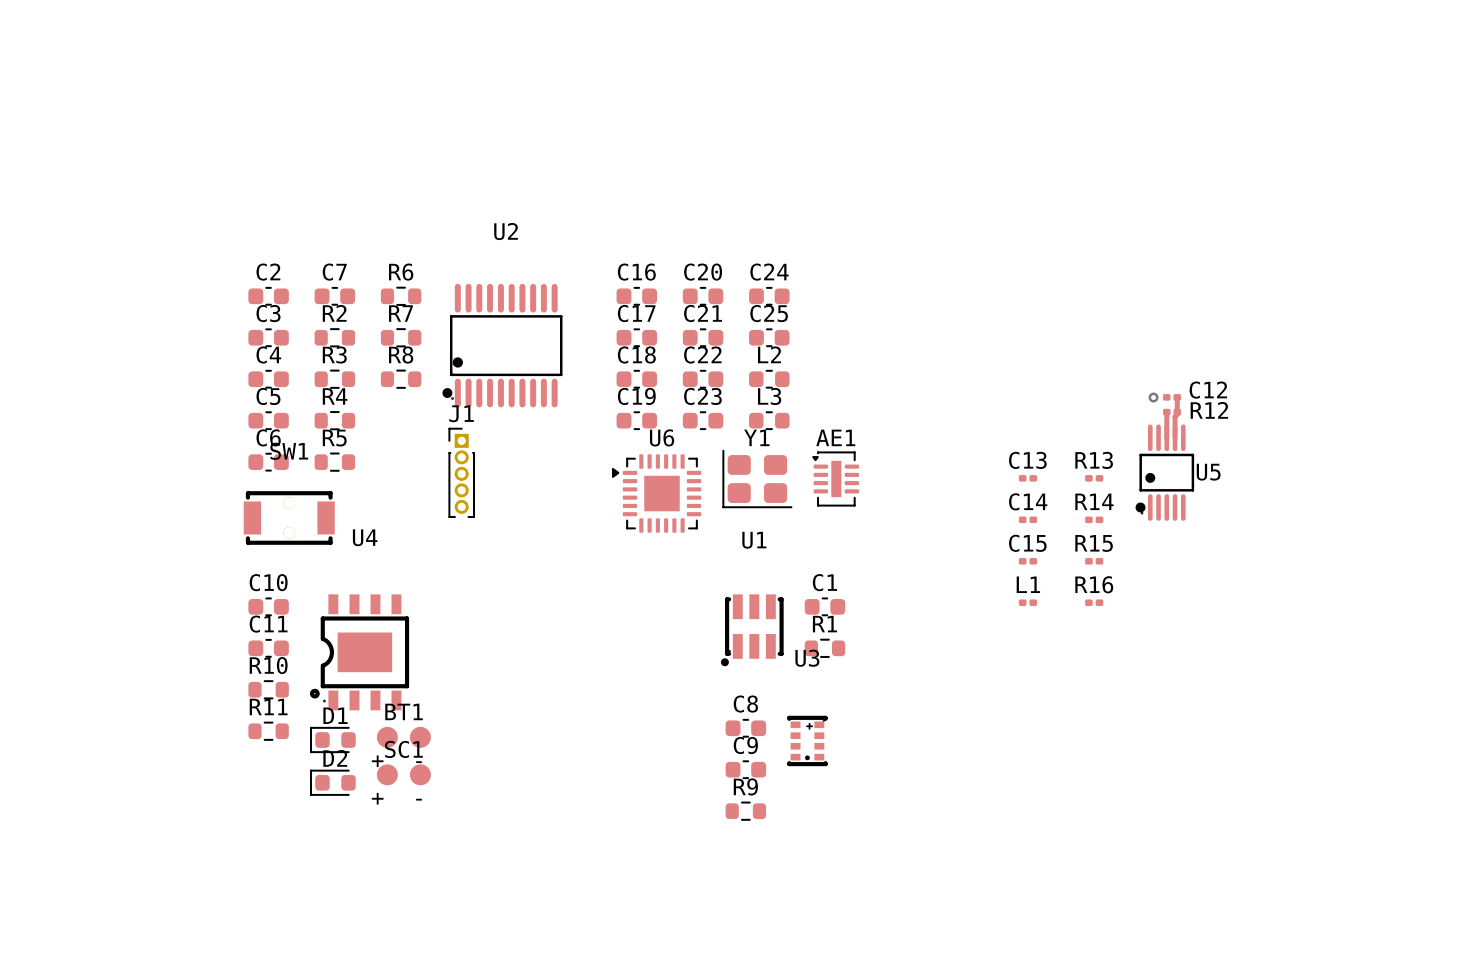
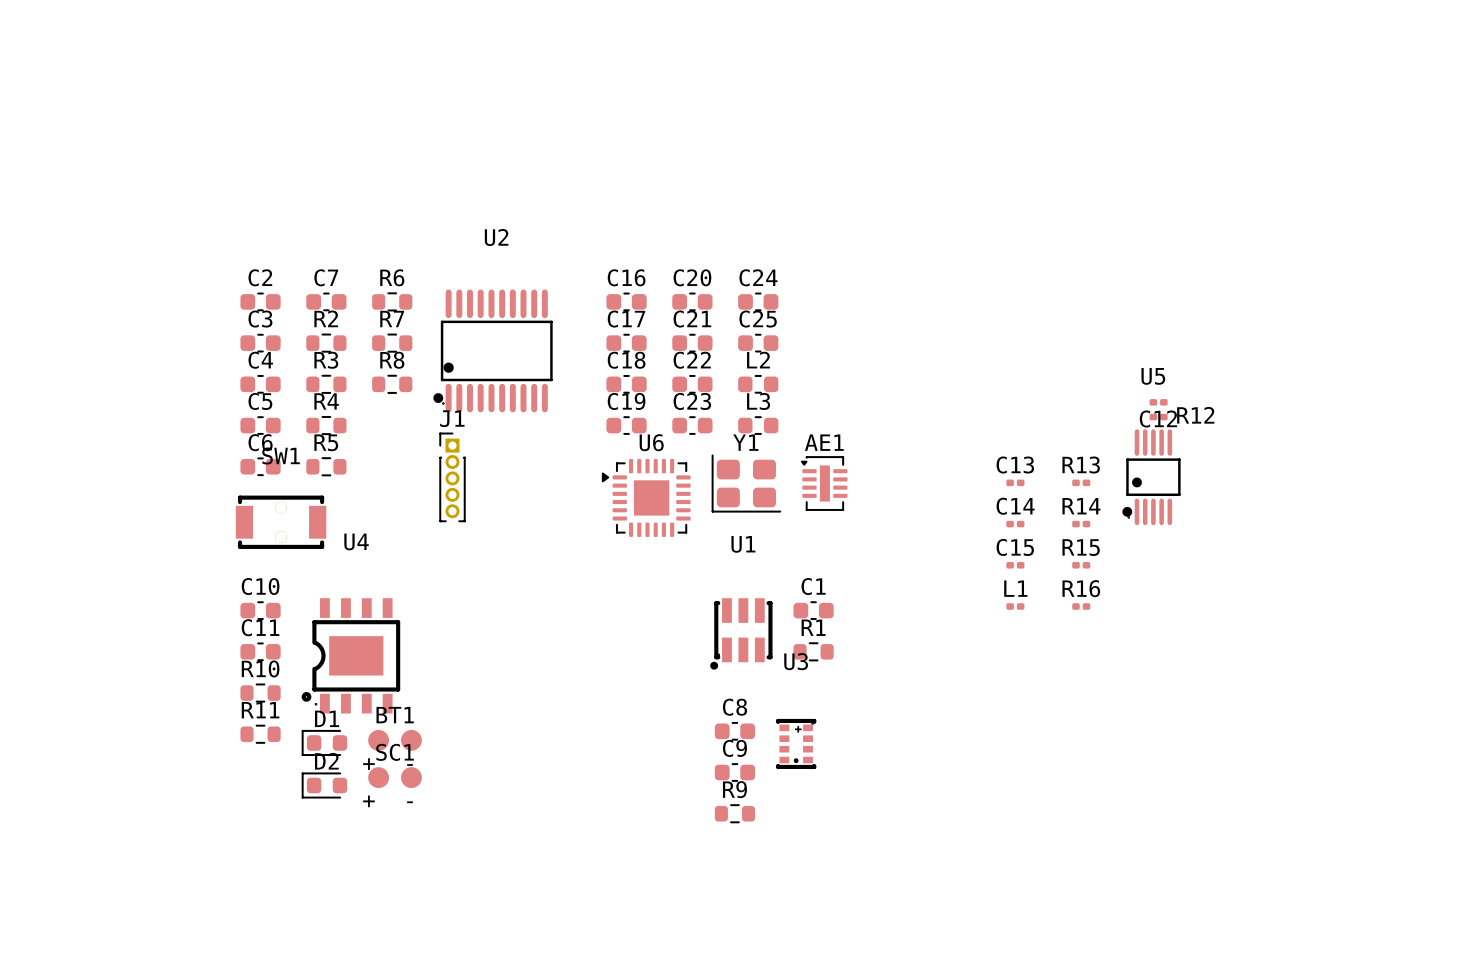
C12 name position: C12 (1208, 390) -> C12 (1158, 419)
via: (1153, 397) -> none
top track: (1177, 397) (1177, 412) -> none
top track: (1167, 410) (1165, 436) -> none
top track: (1177, 414) (1175, 416) (1175, 437) -> none
U5 name position: U5 (1208, 472) -> U5 (1153, 376)

